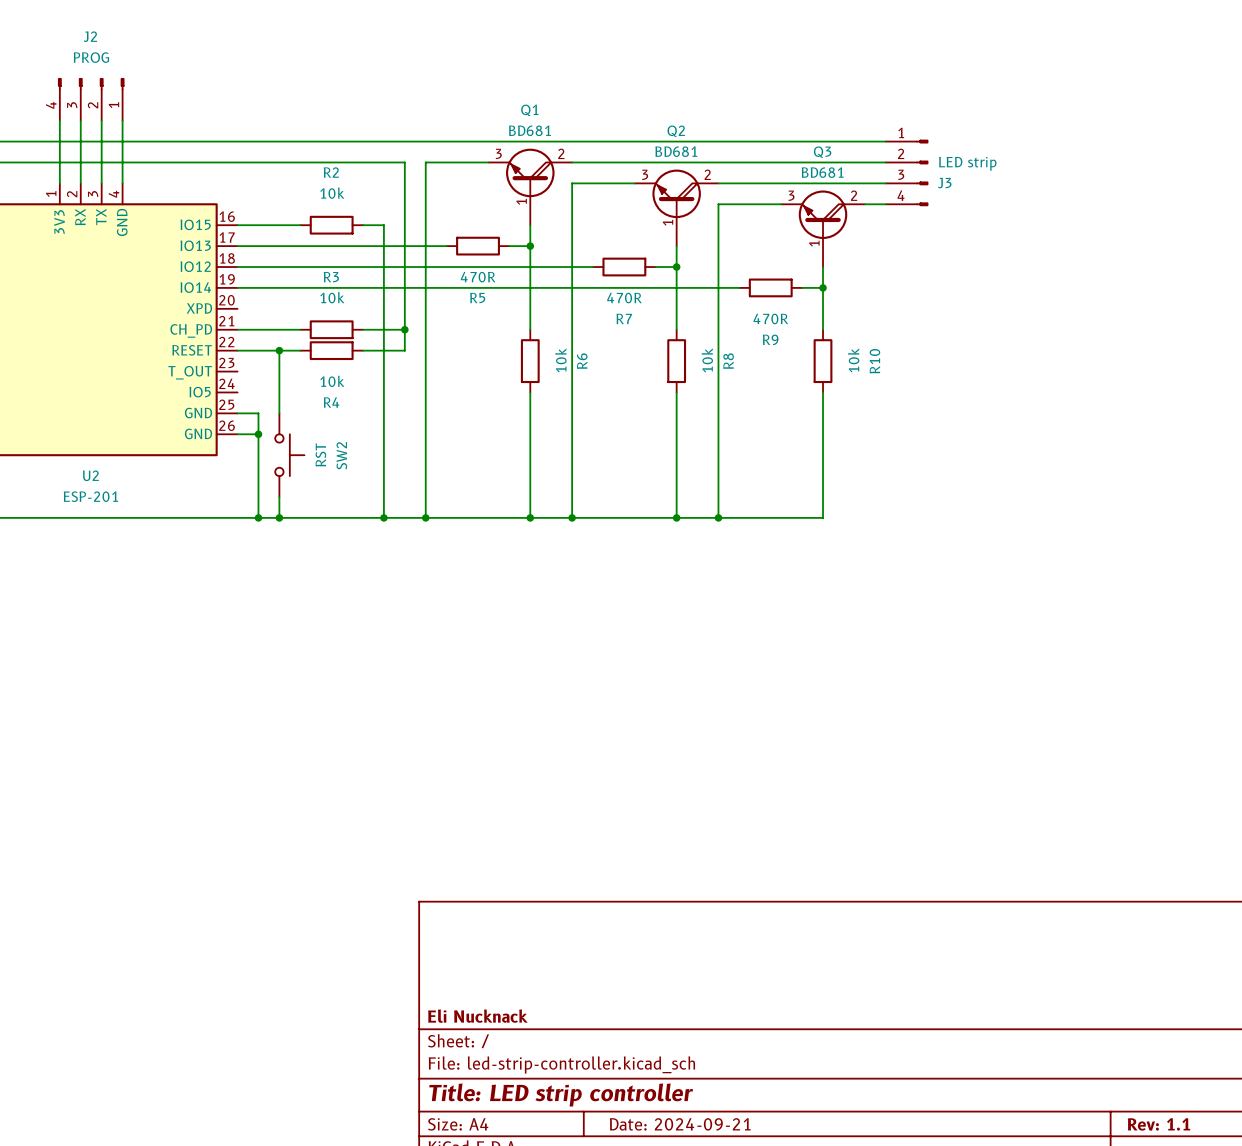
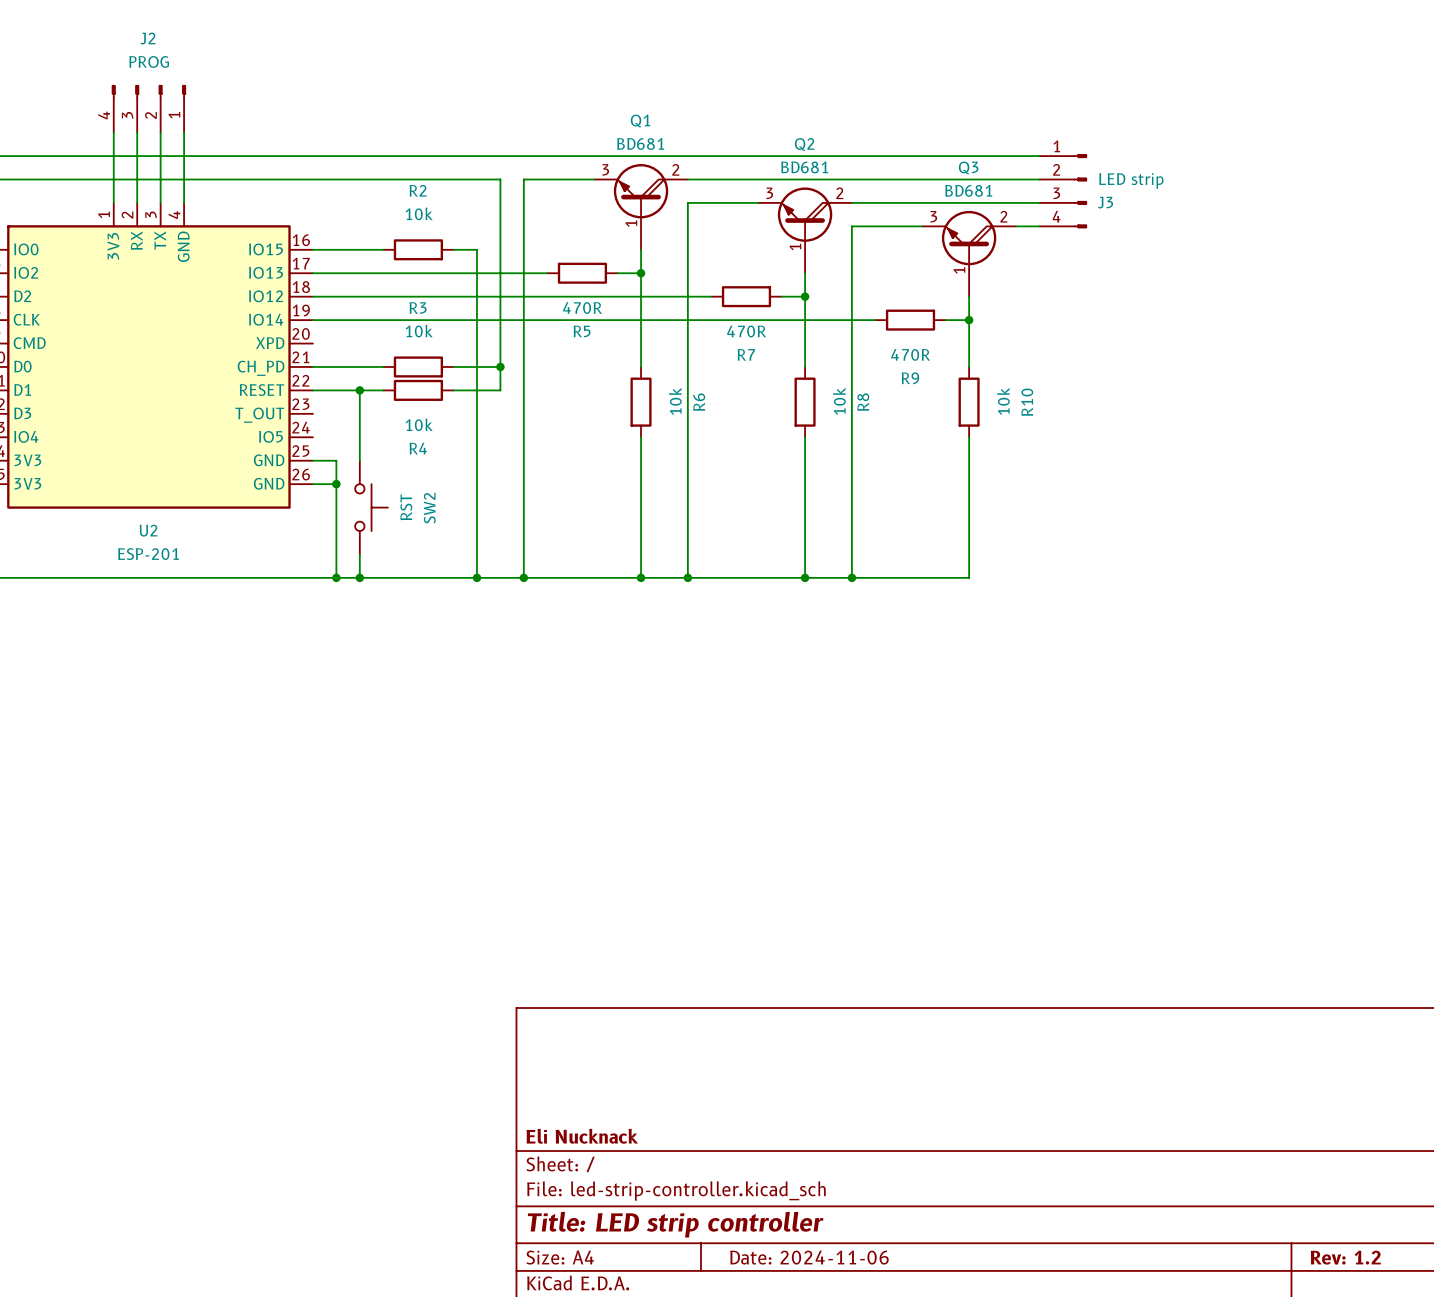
title block: Date: 2024-09-21 (680, 1124) -> Date: 2024-11-06 (809, 1257)
title block: Rev: 1.1 (1158, 1124) -> Rev: 1.2 (1345, 1257)

